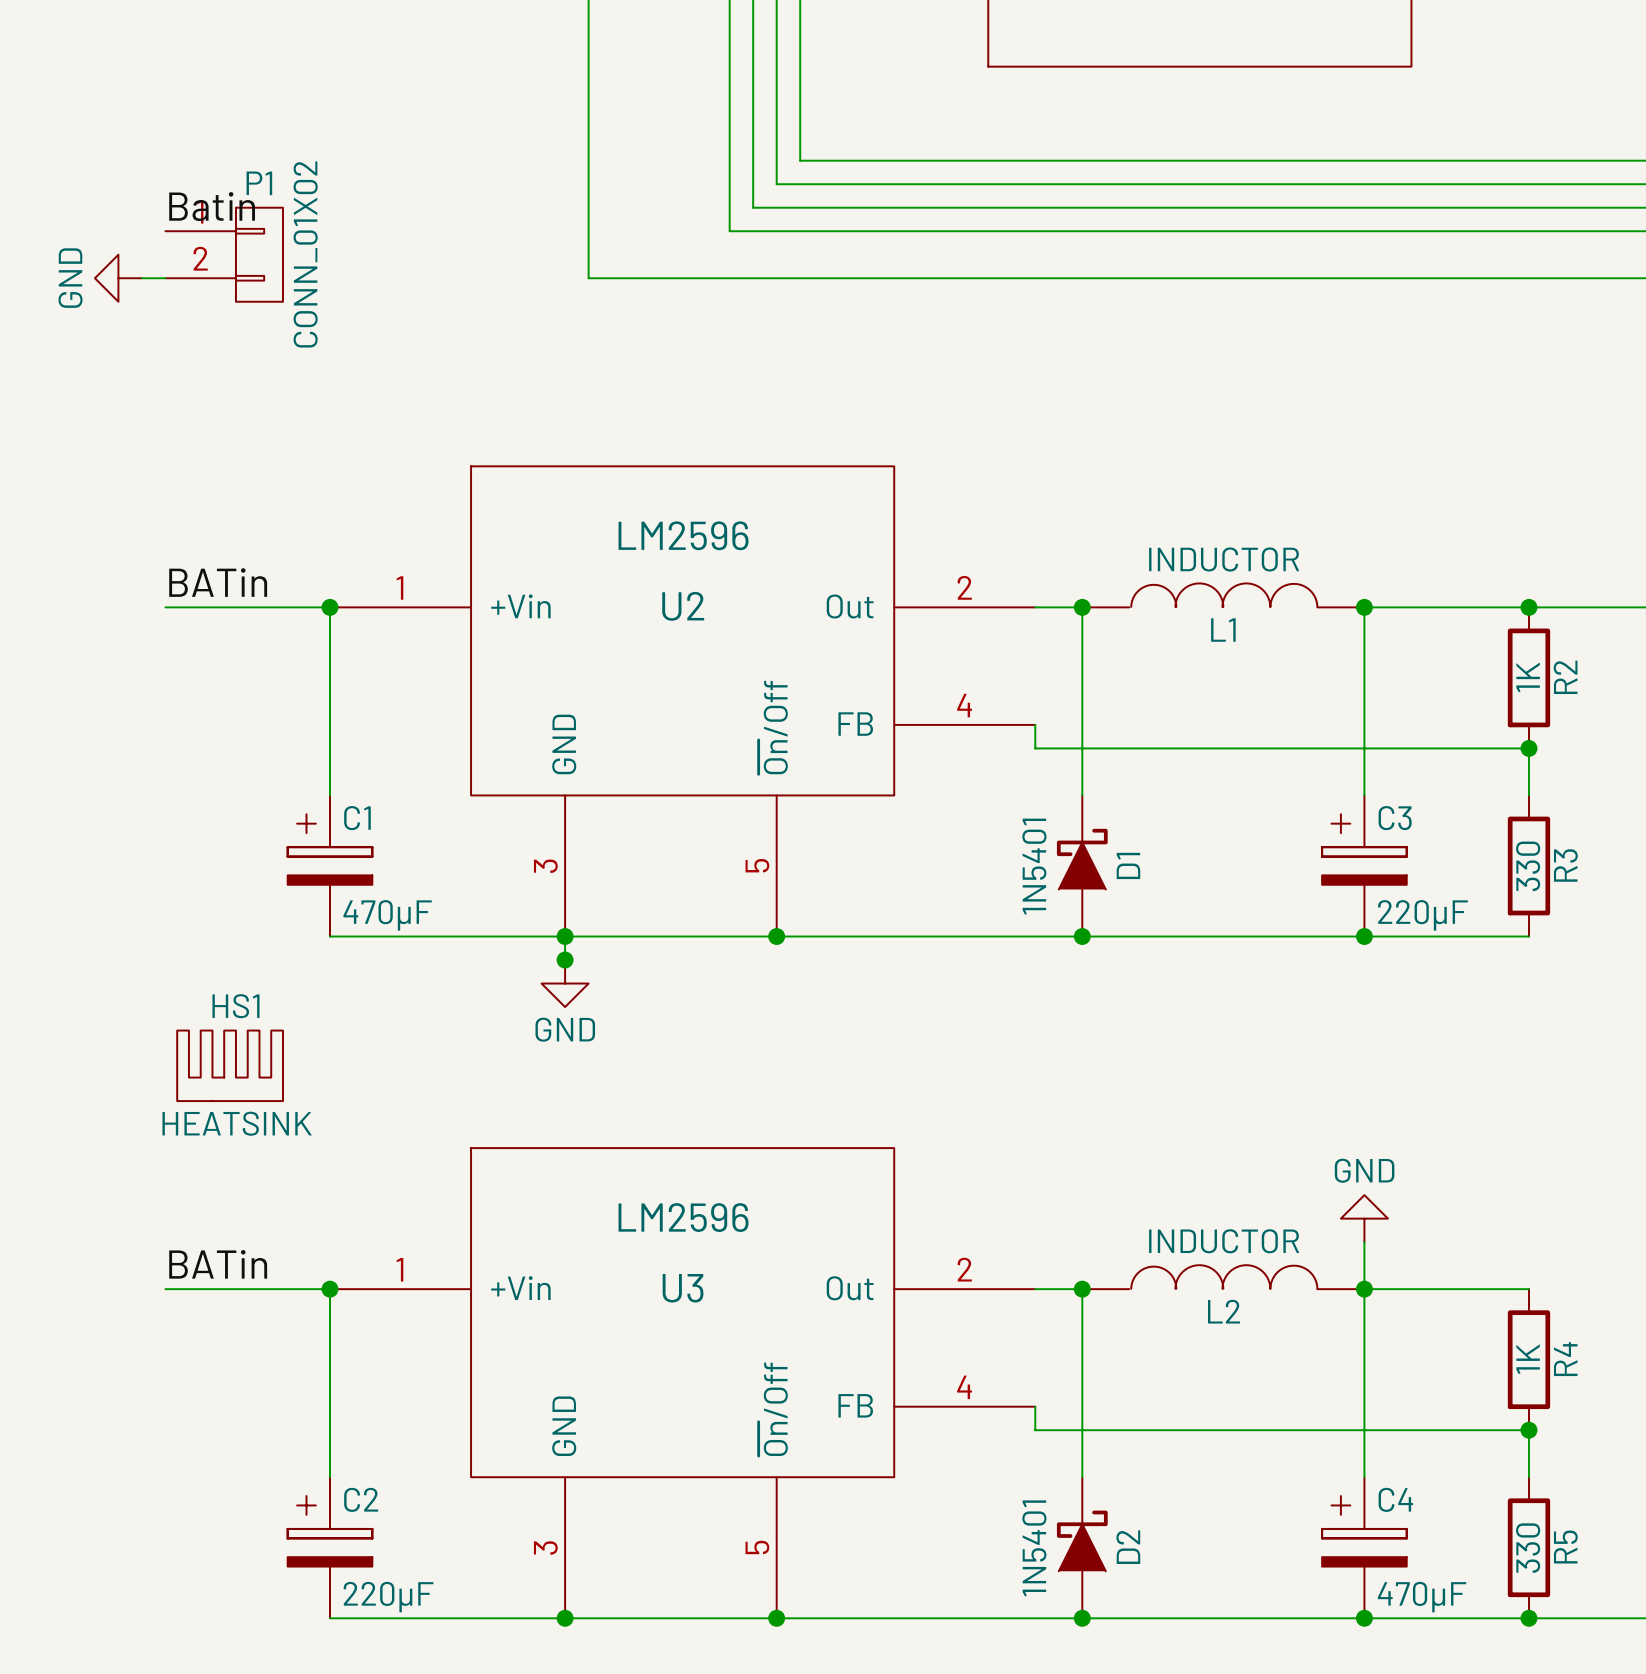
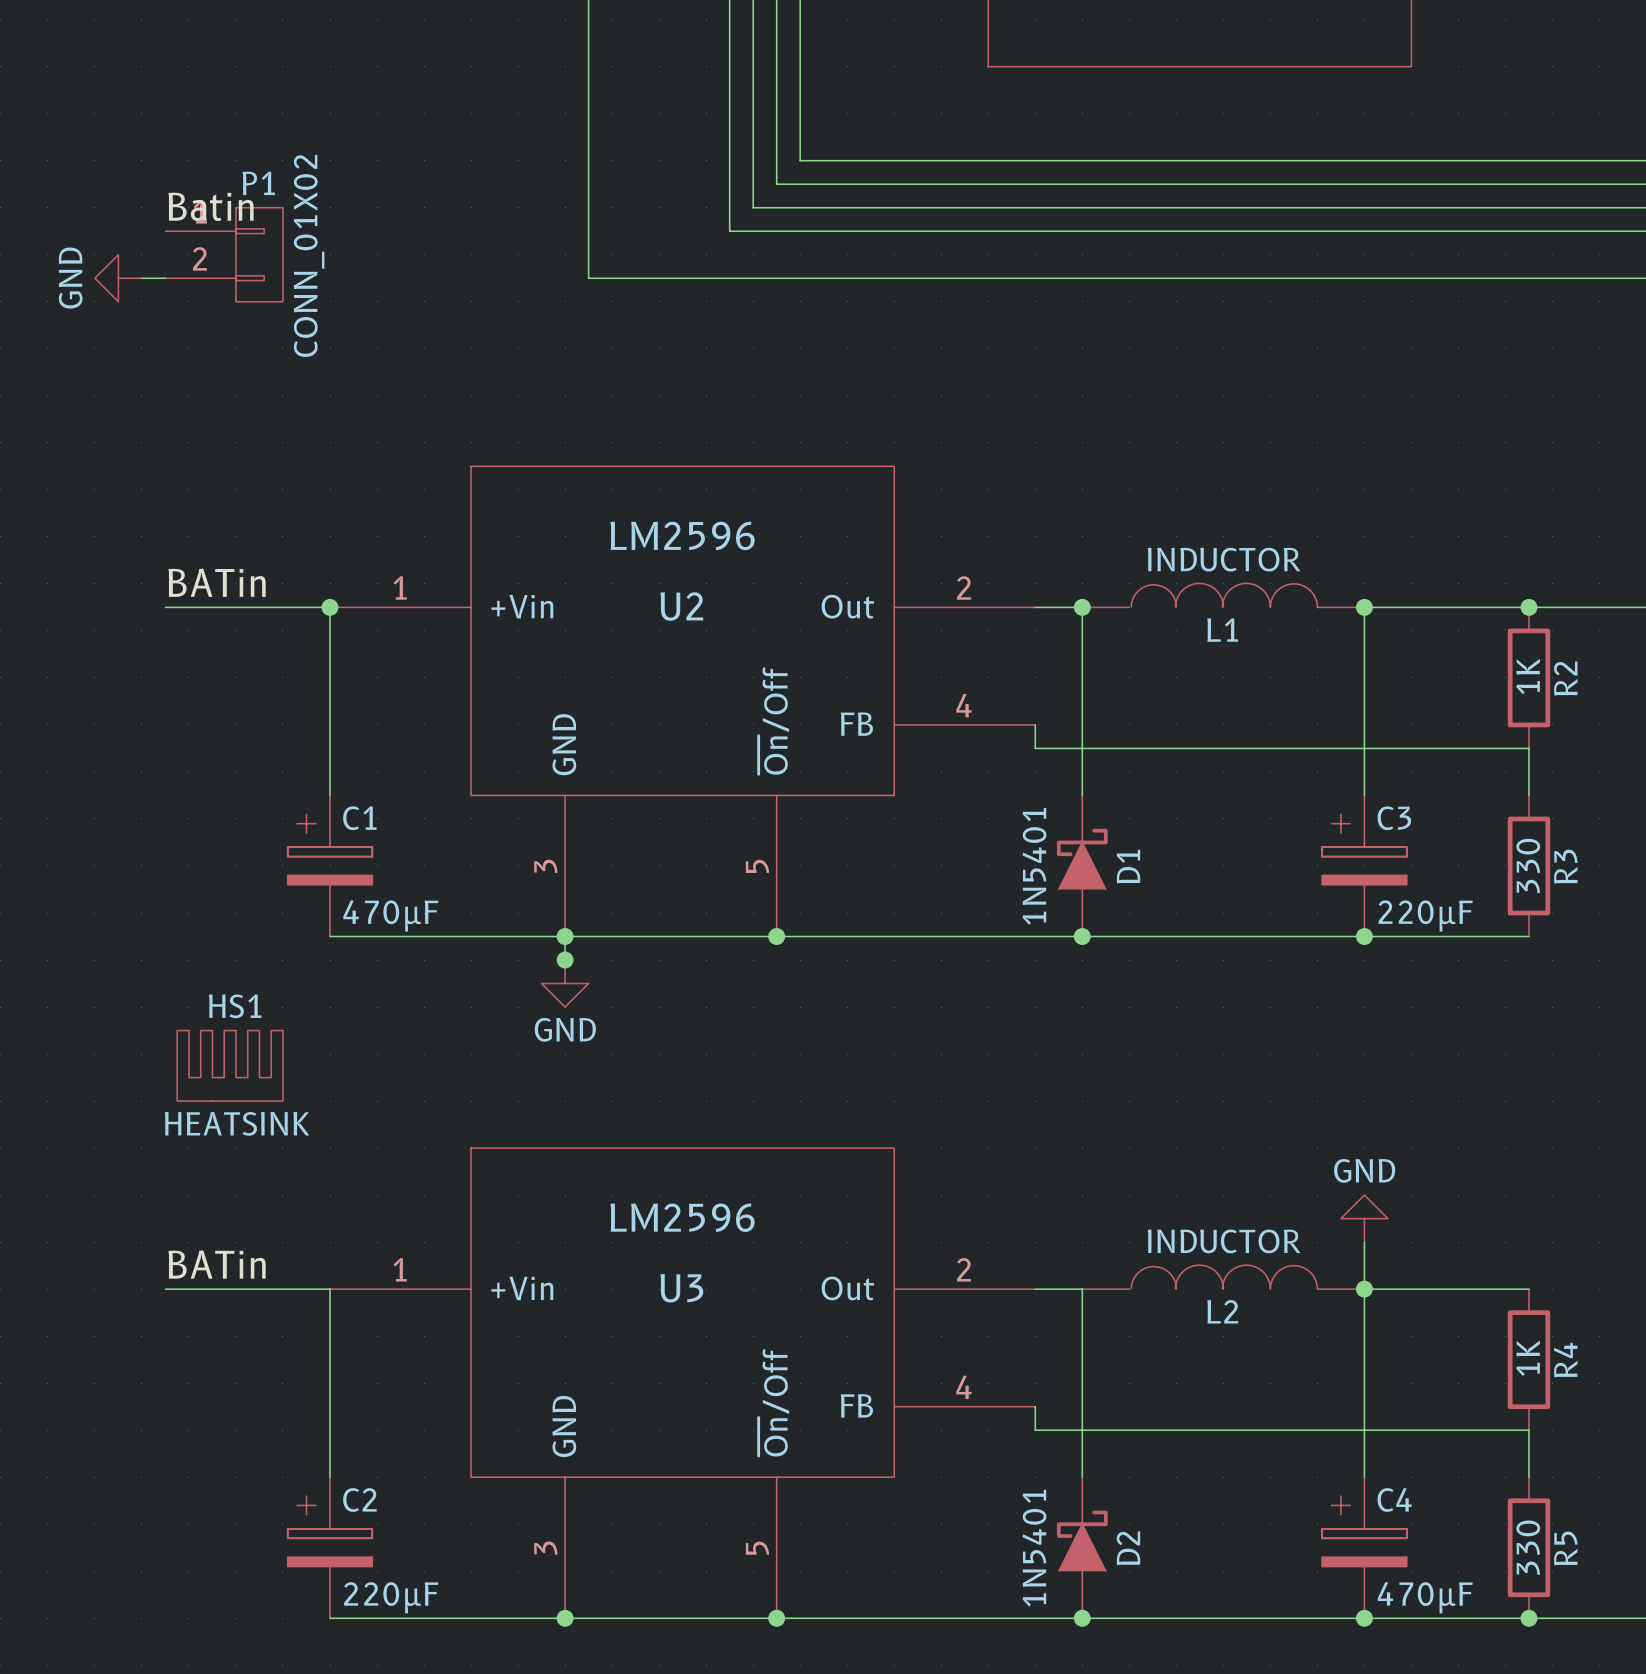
junction: (1528, 748) -> none
junction: (330, 1289) -> none
junction: (1082, 1289) -> none
junction: (1528, 1430) -> none

